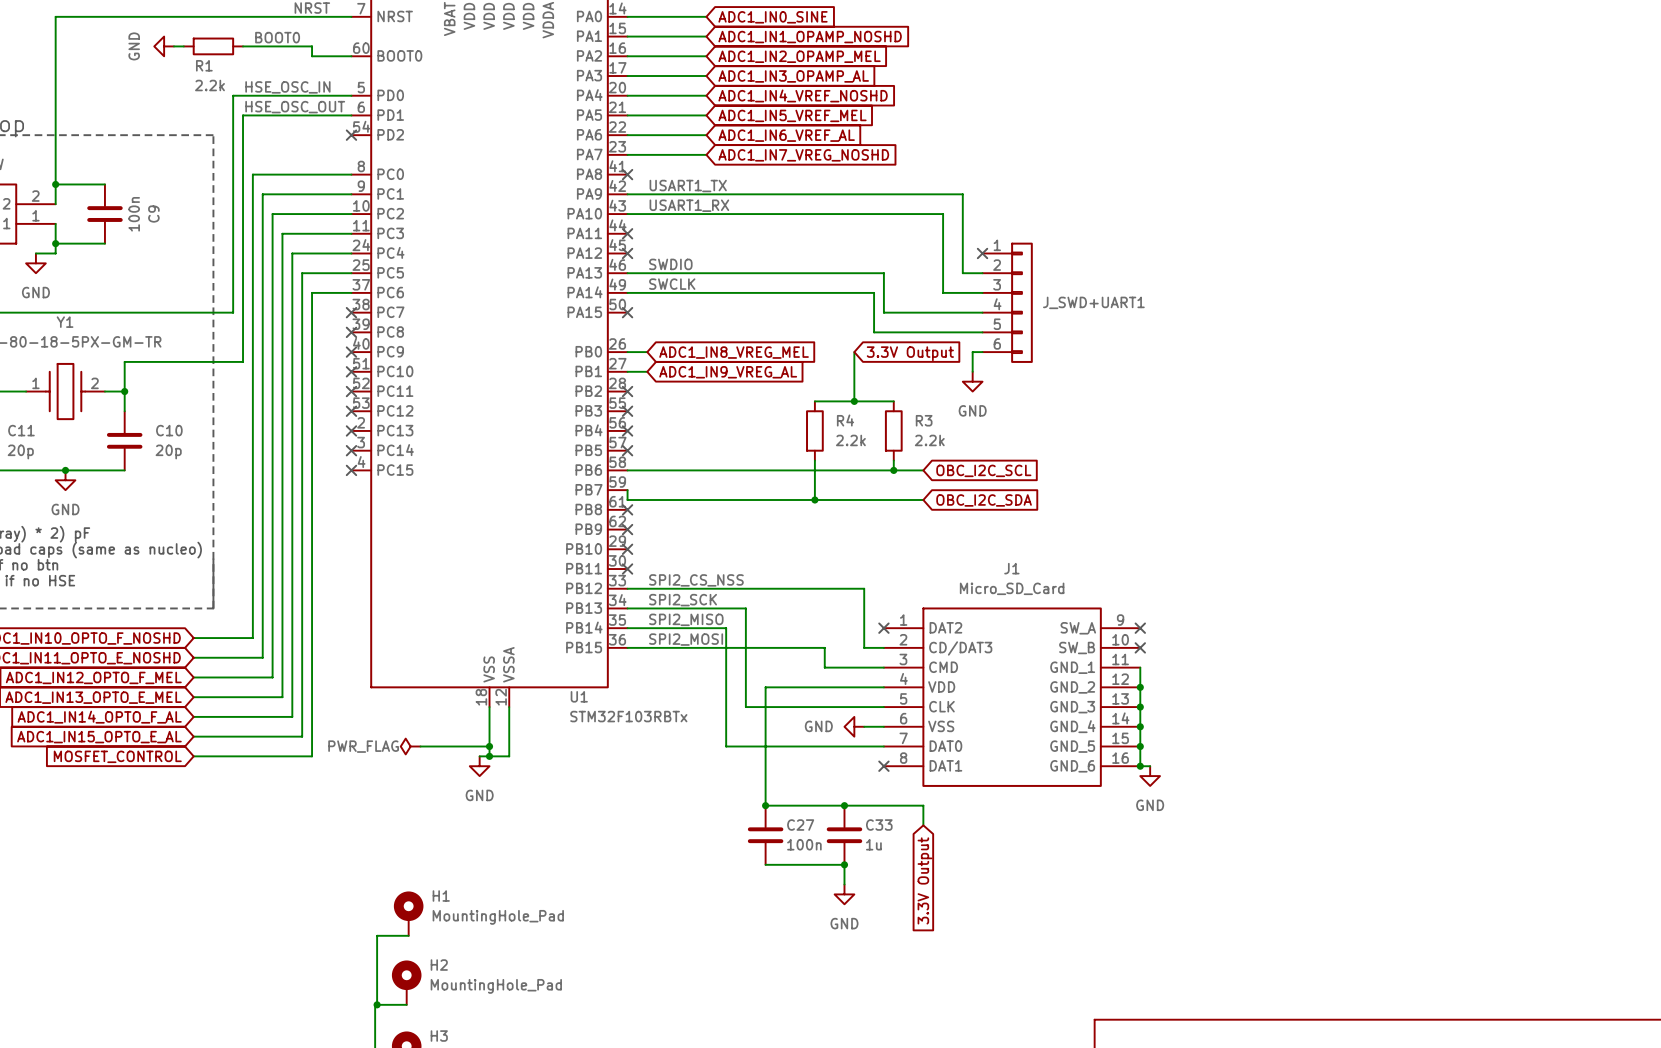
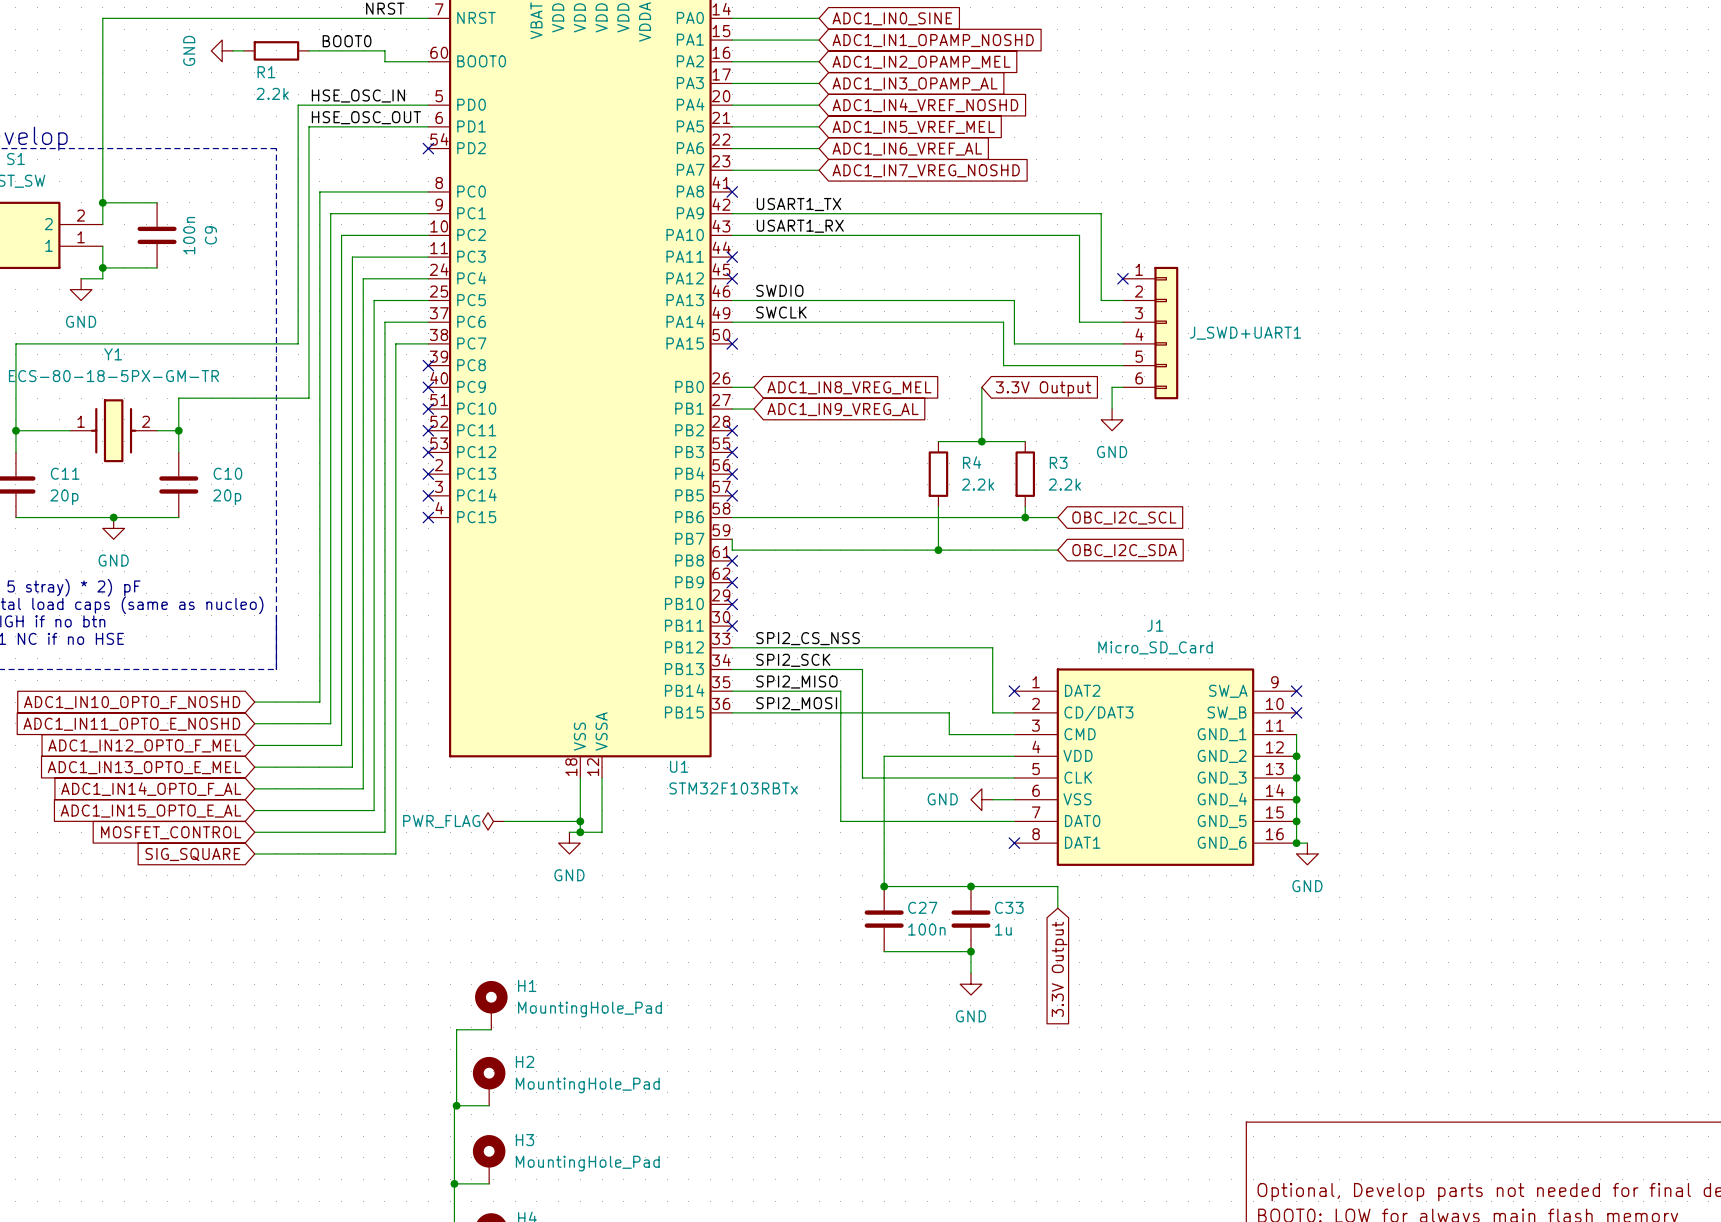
wire: none -> (428, 343) (395, 343) (395, 853) (254, 853)
no-connect mark: (351, 312) -> none
global label: none -> SIG_SQUARE (192, 854)

